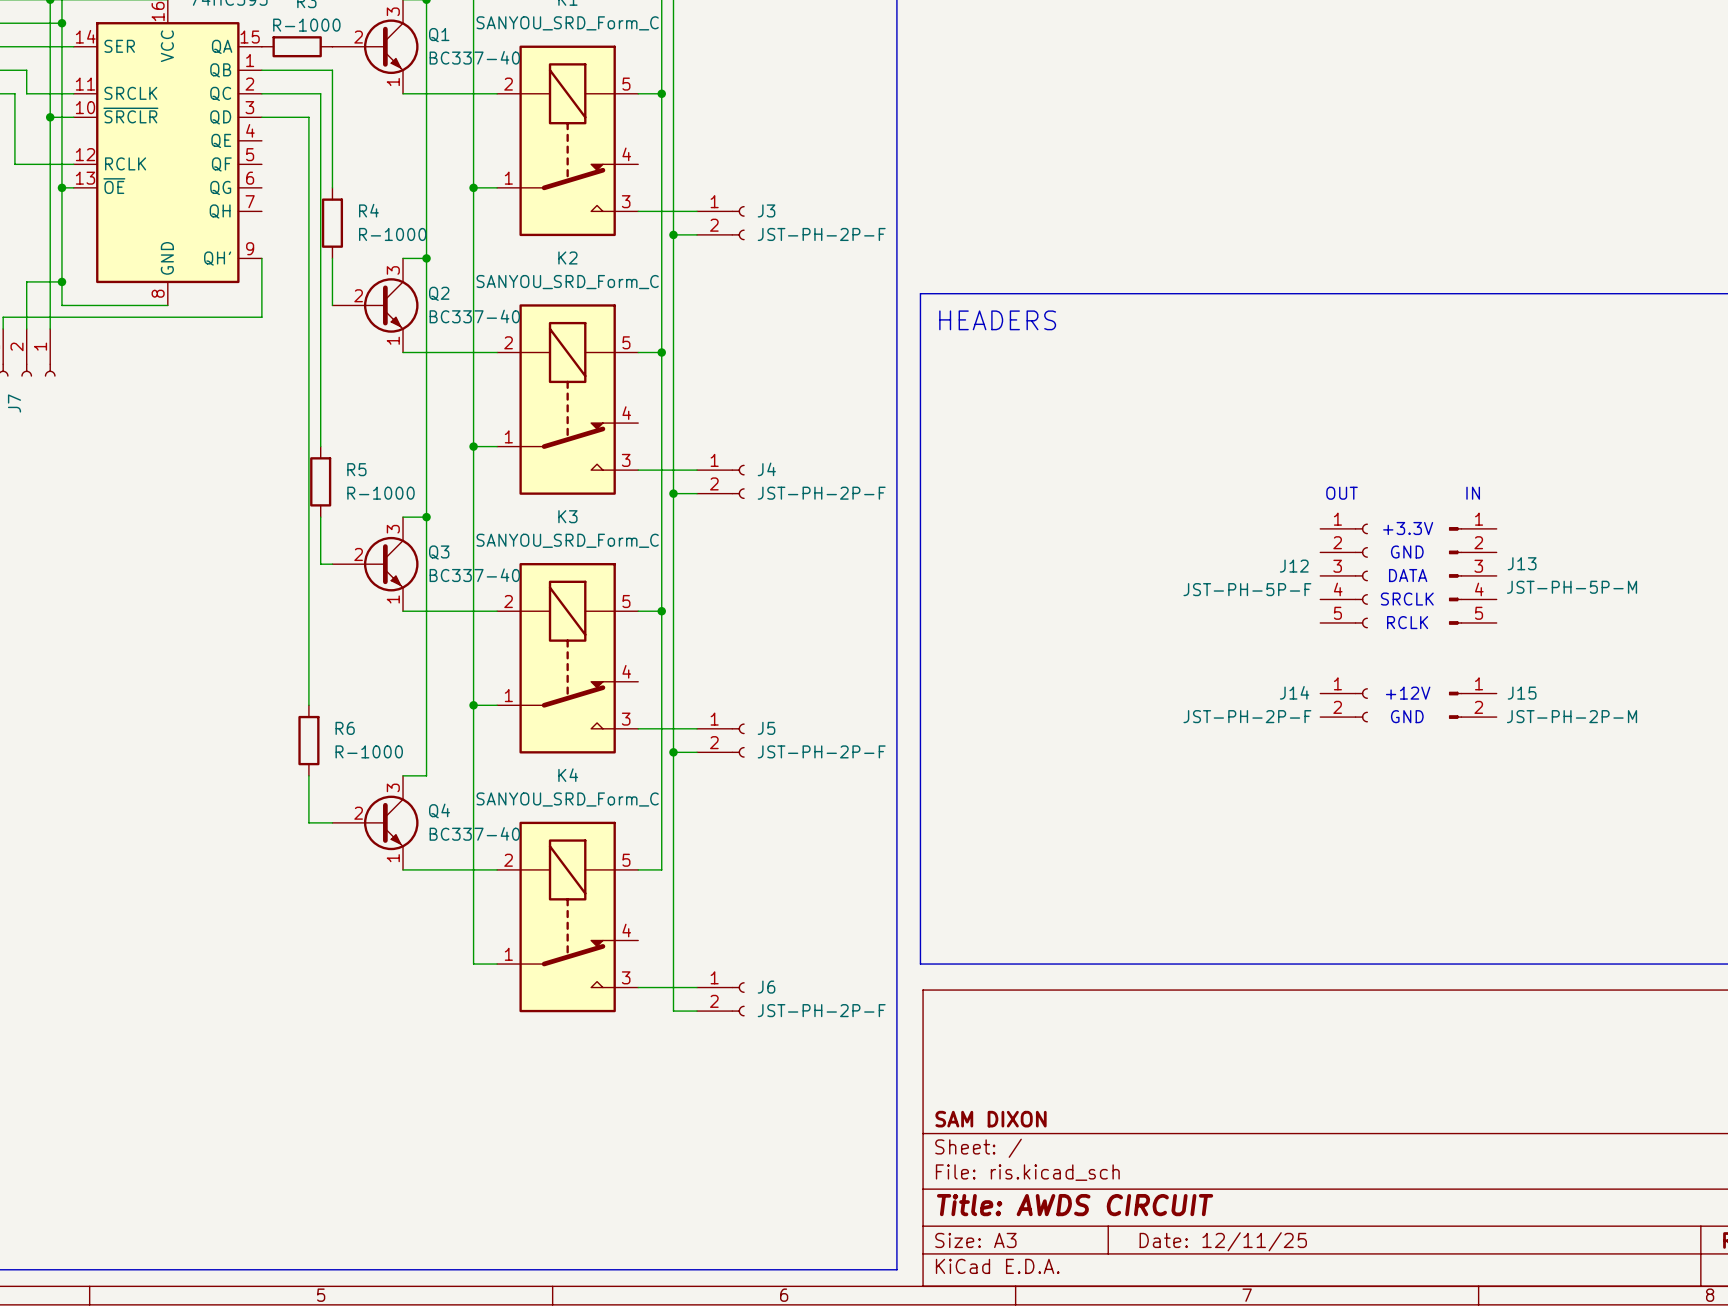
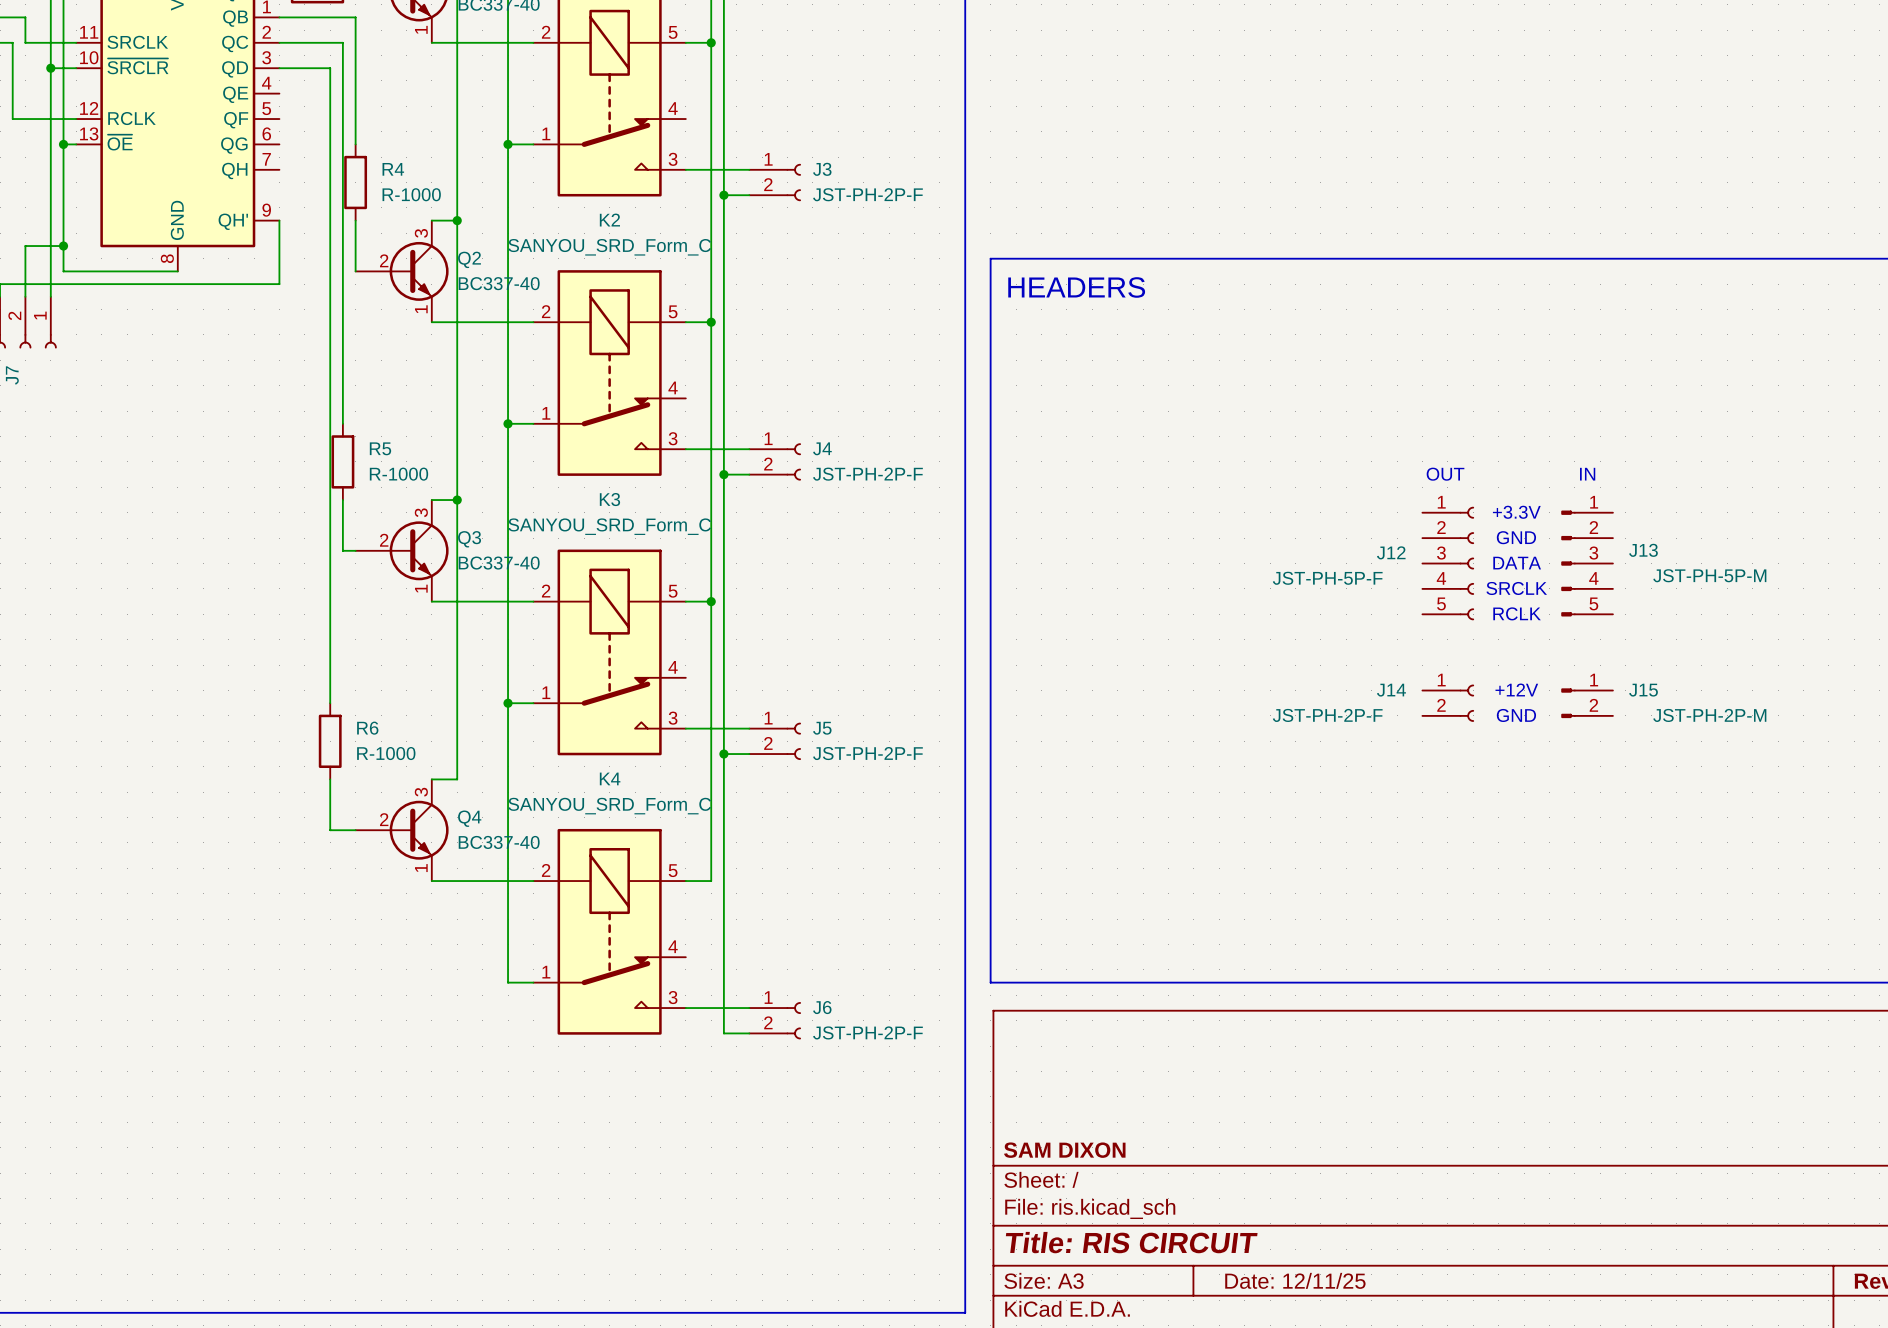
title block: Title: AWDS CIRCUIT (1075, 1205) -> Title: RIS CIRCUIT (1131, 1242)

